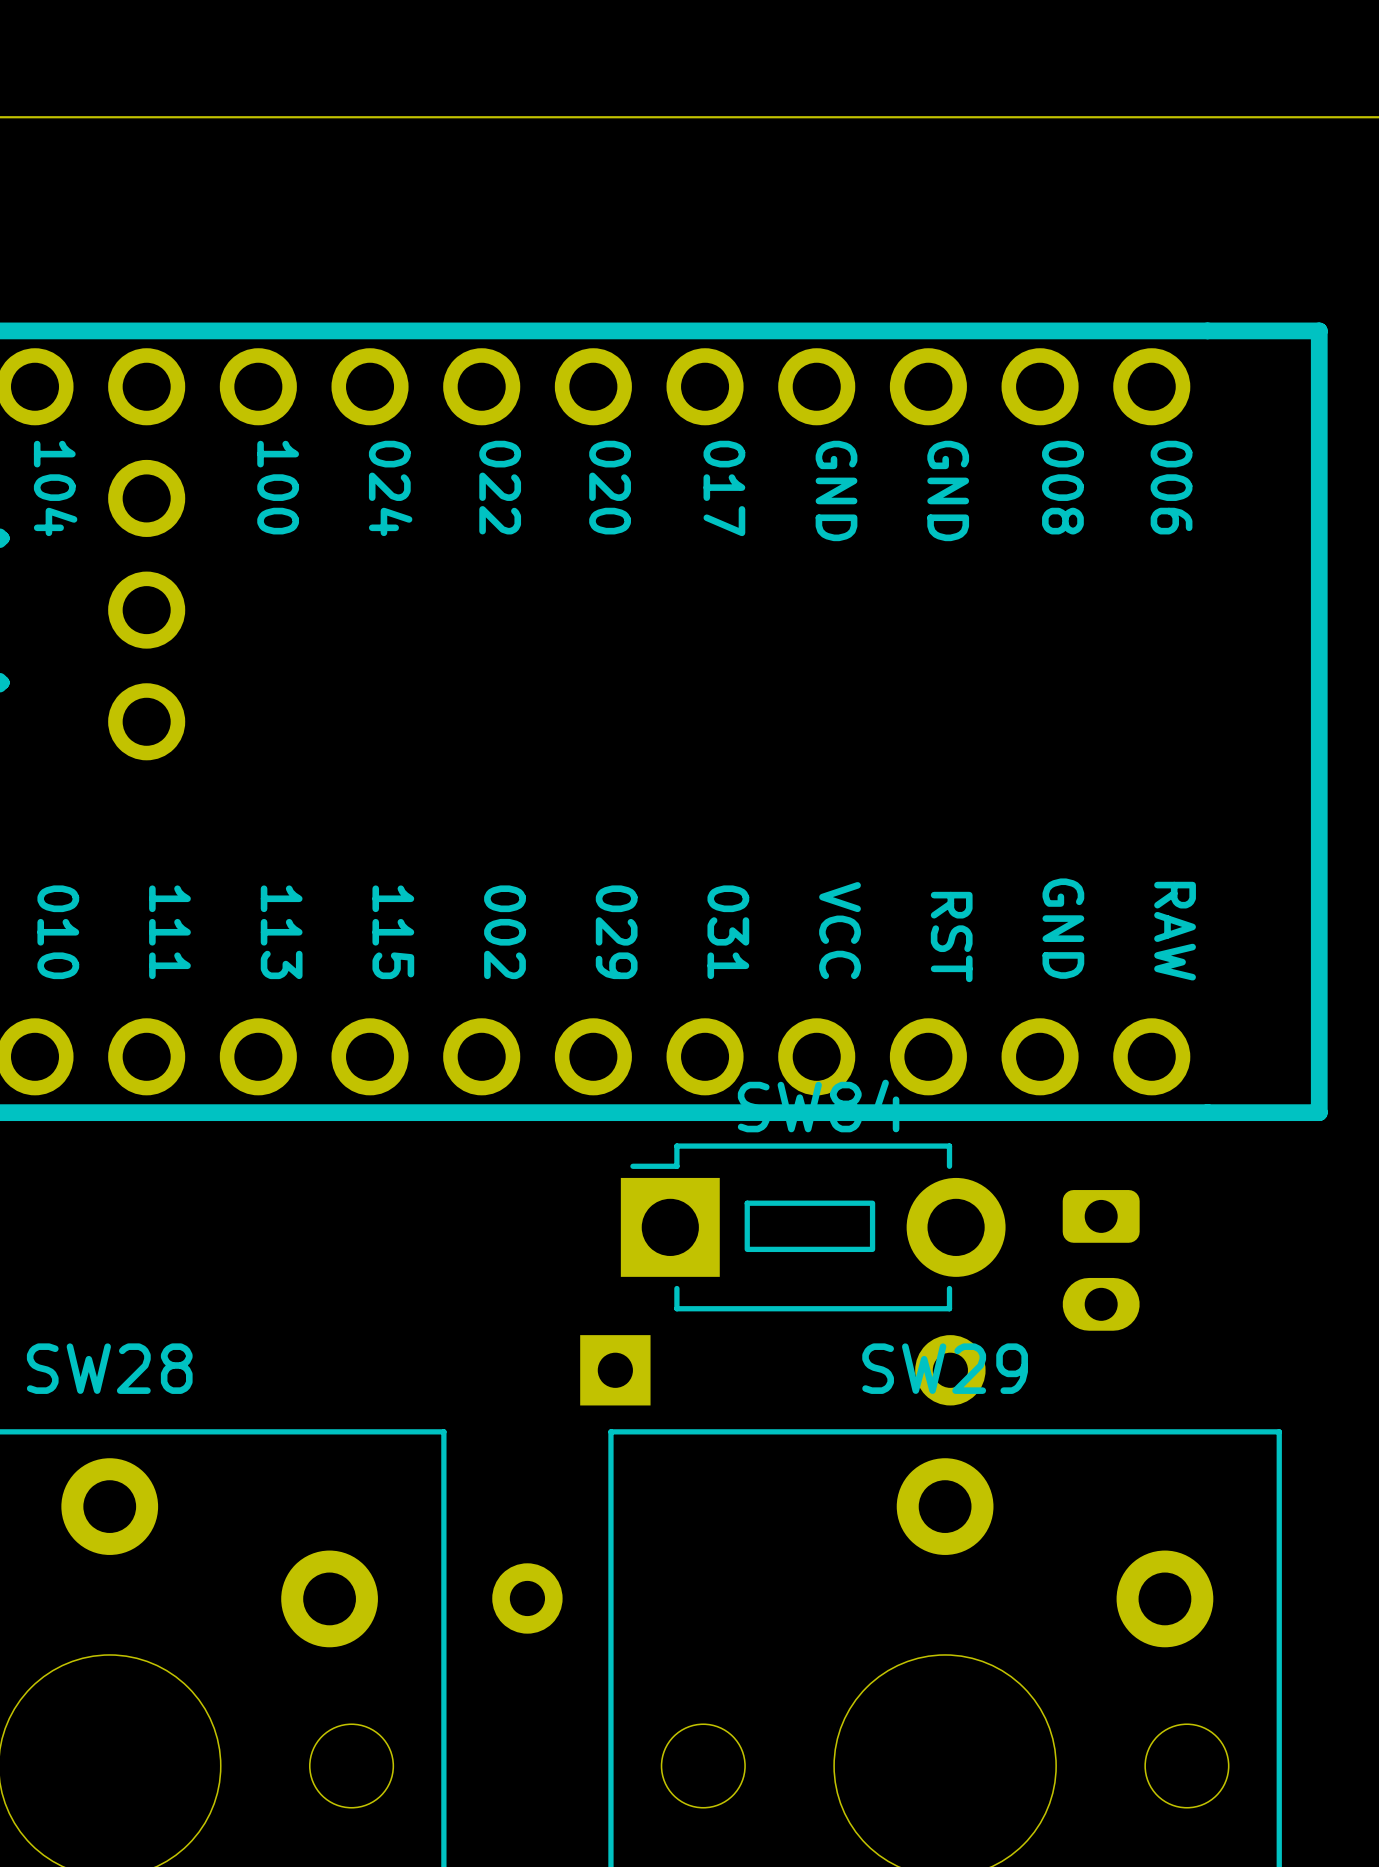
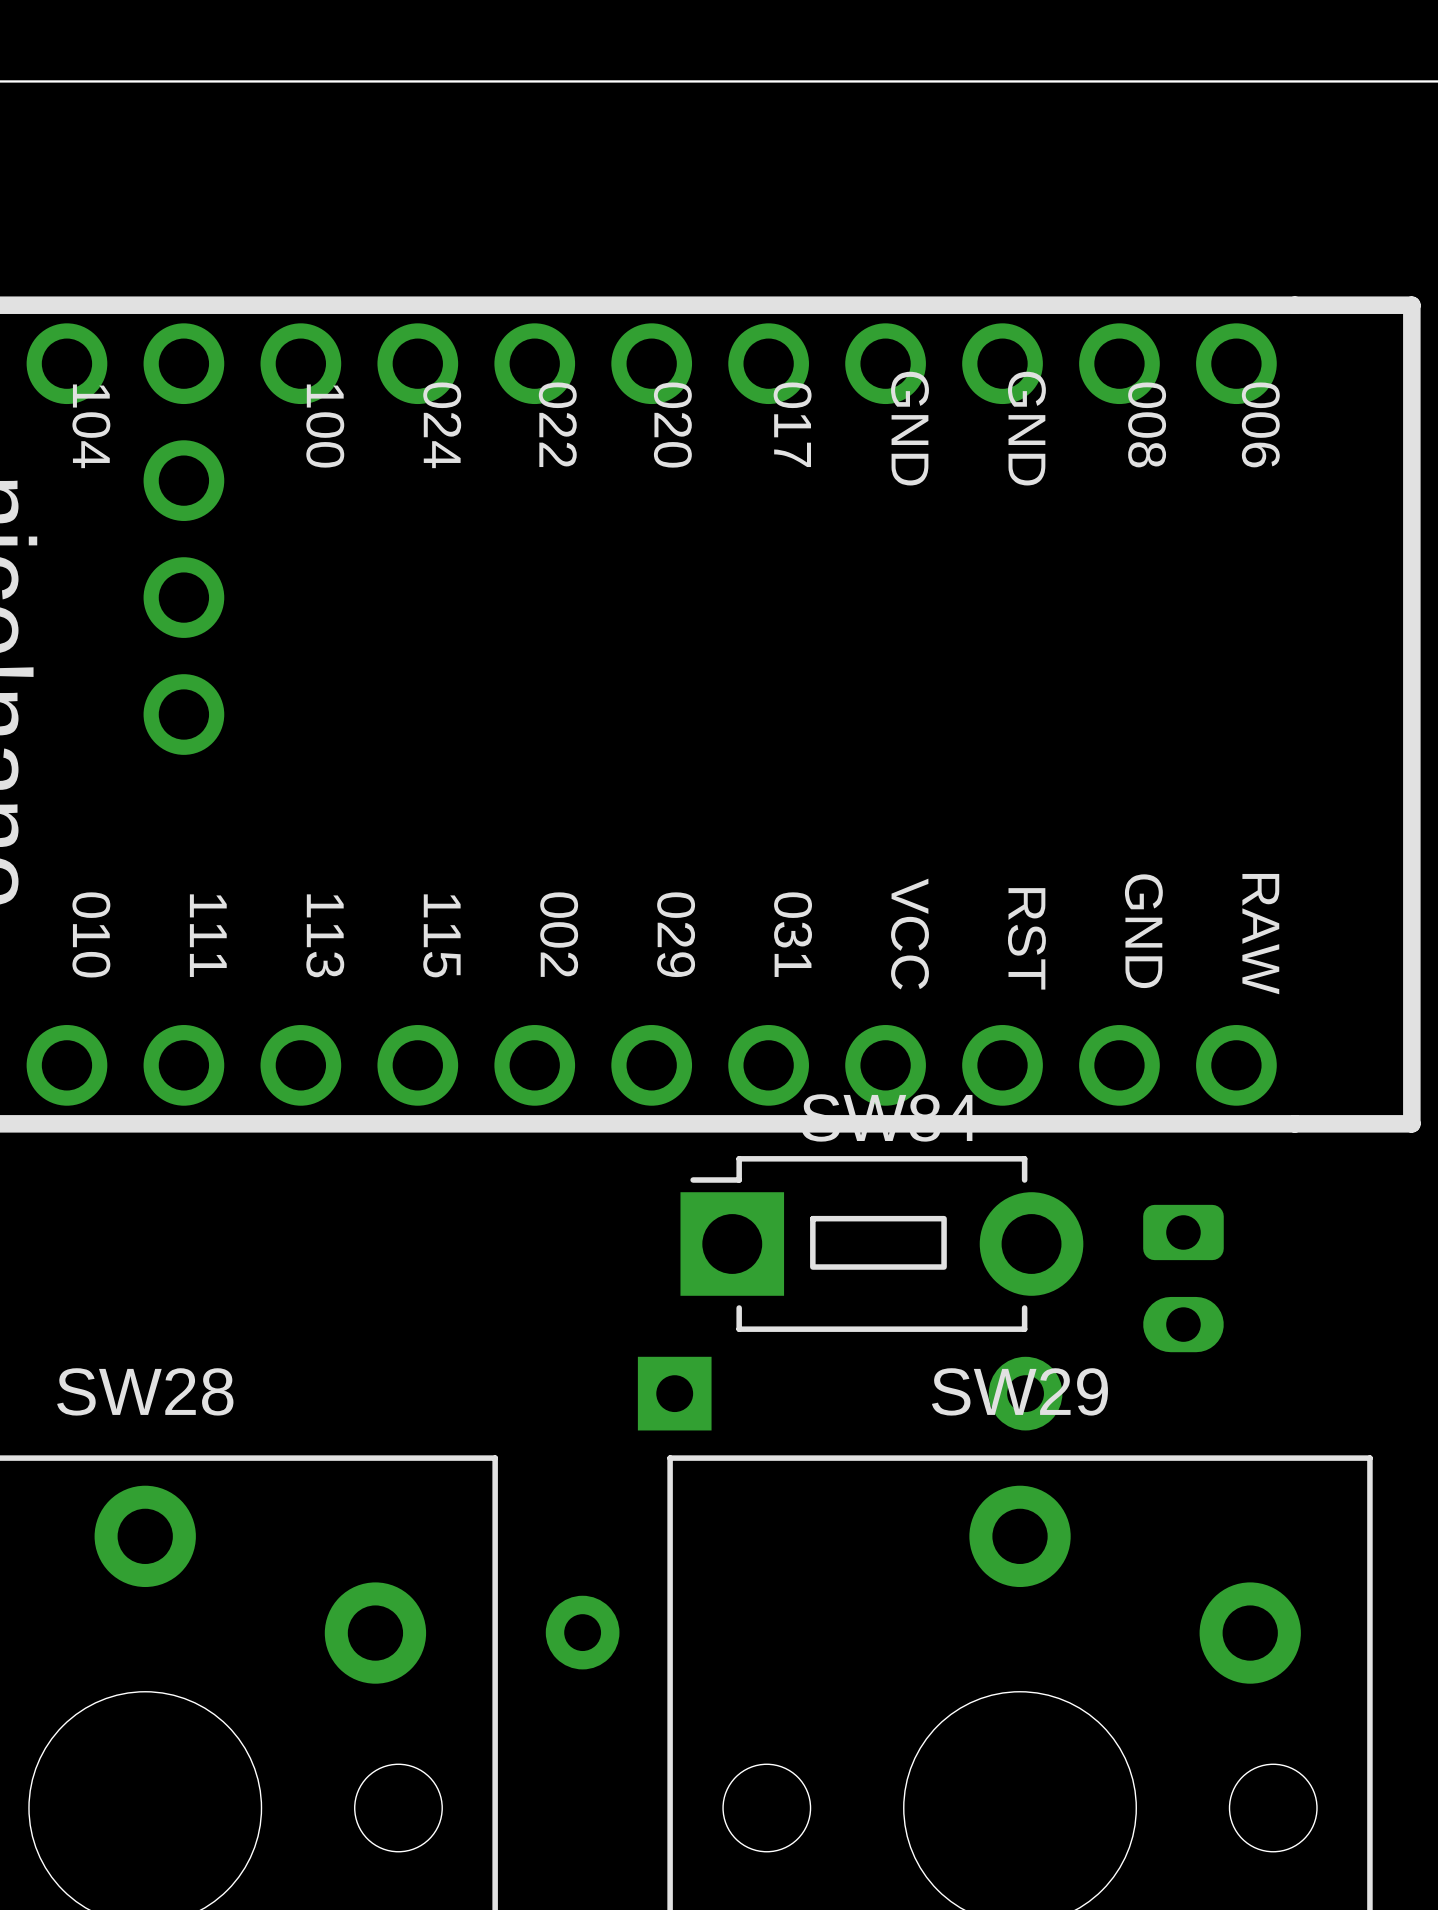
text position: 100 (278, 487) -> 100 (325, 426)
text position: 022 (500, 487) -> 022 (557, 424)
text position: 020 (610, 487) -> 020 (672, 425)
text position: 008 (1062, 487) -> 008 (1147, 424)
text position: 006 (1171, 487) -> 006 (1260, 424)
text position: 104 (55, 488) -> 104 (91, 426)
text position: 024 (390, 488) -> 024 (442, 425)
text position: 017 (724, 488) -> 017 (792, 424)
text position: GND (836, 490) -> GND (909, 428)
text position: GND (948, 490) -> GND (1026, 428)

